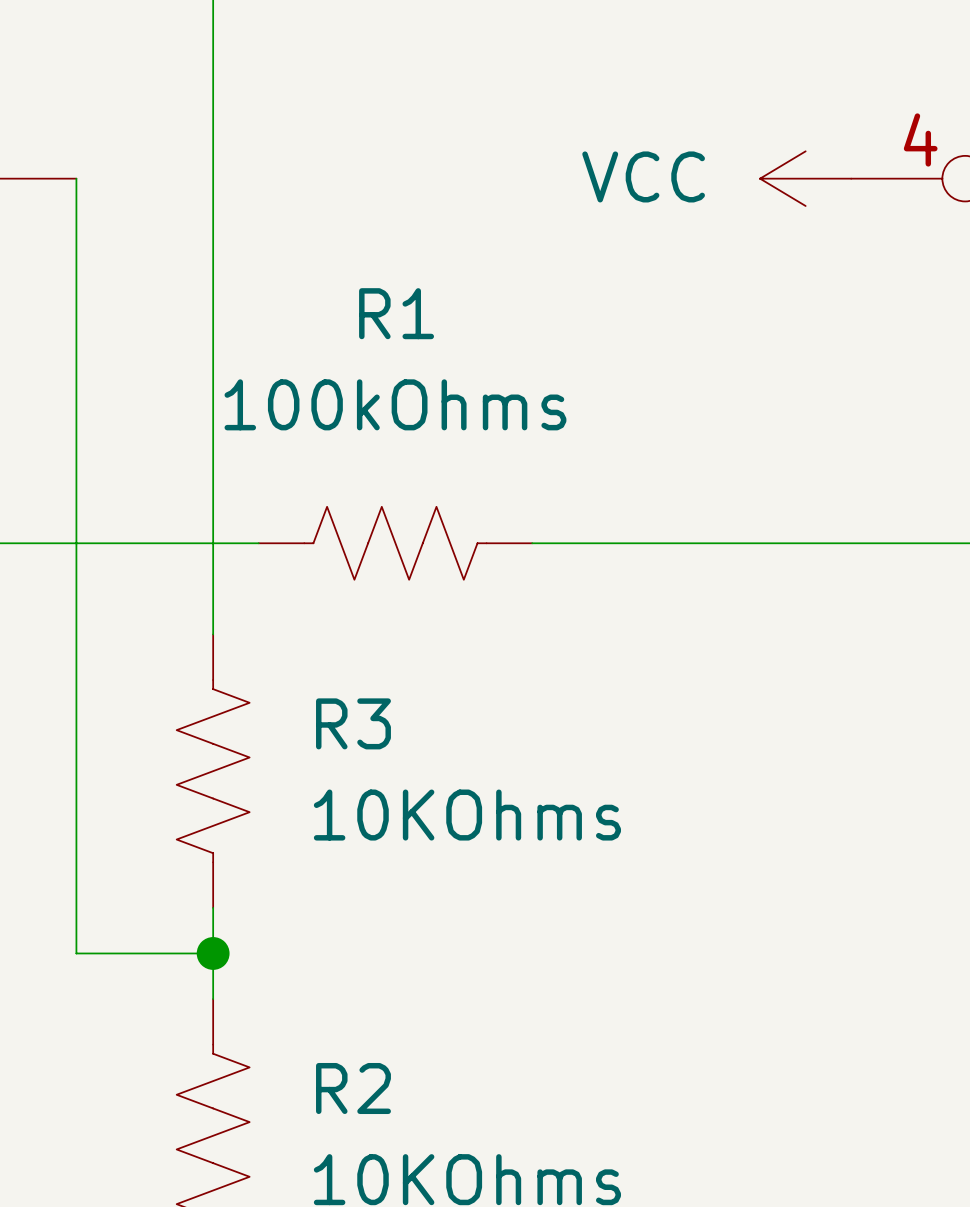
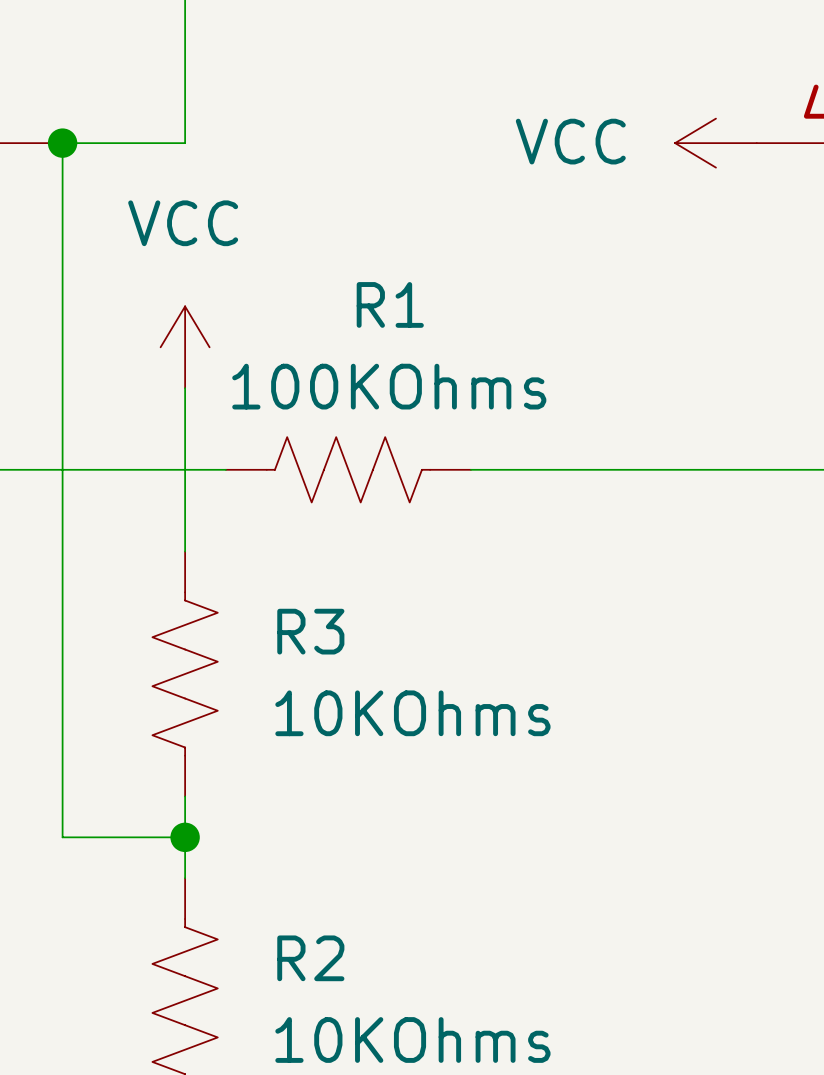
junction: none -> (62, 143)
wire: (213, 178) (213, 452) -> (185, 143) (62, 143)
R1 name position: R1 (396, 313) -> R1 (390, 304)
R1 value: 100kOhms (395, 404) -> 100KOhms (389, 386)
power symbol: none -> VCC (185, 347)

